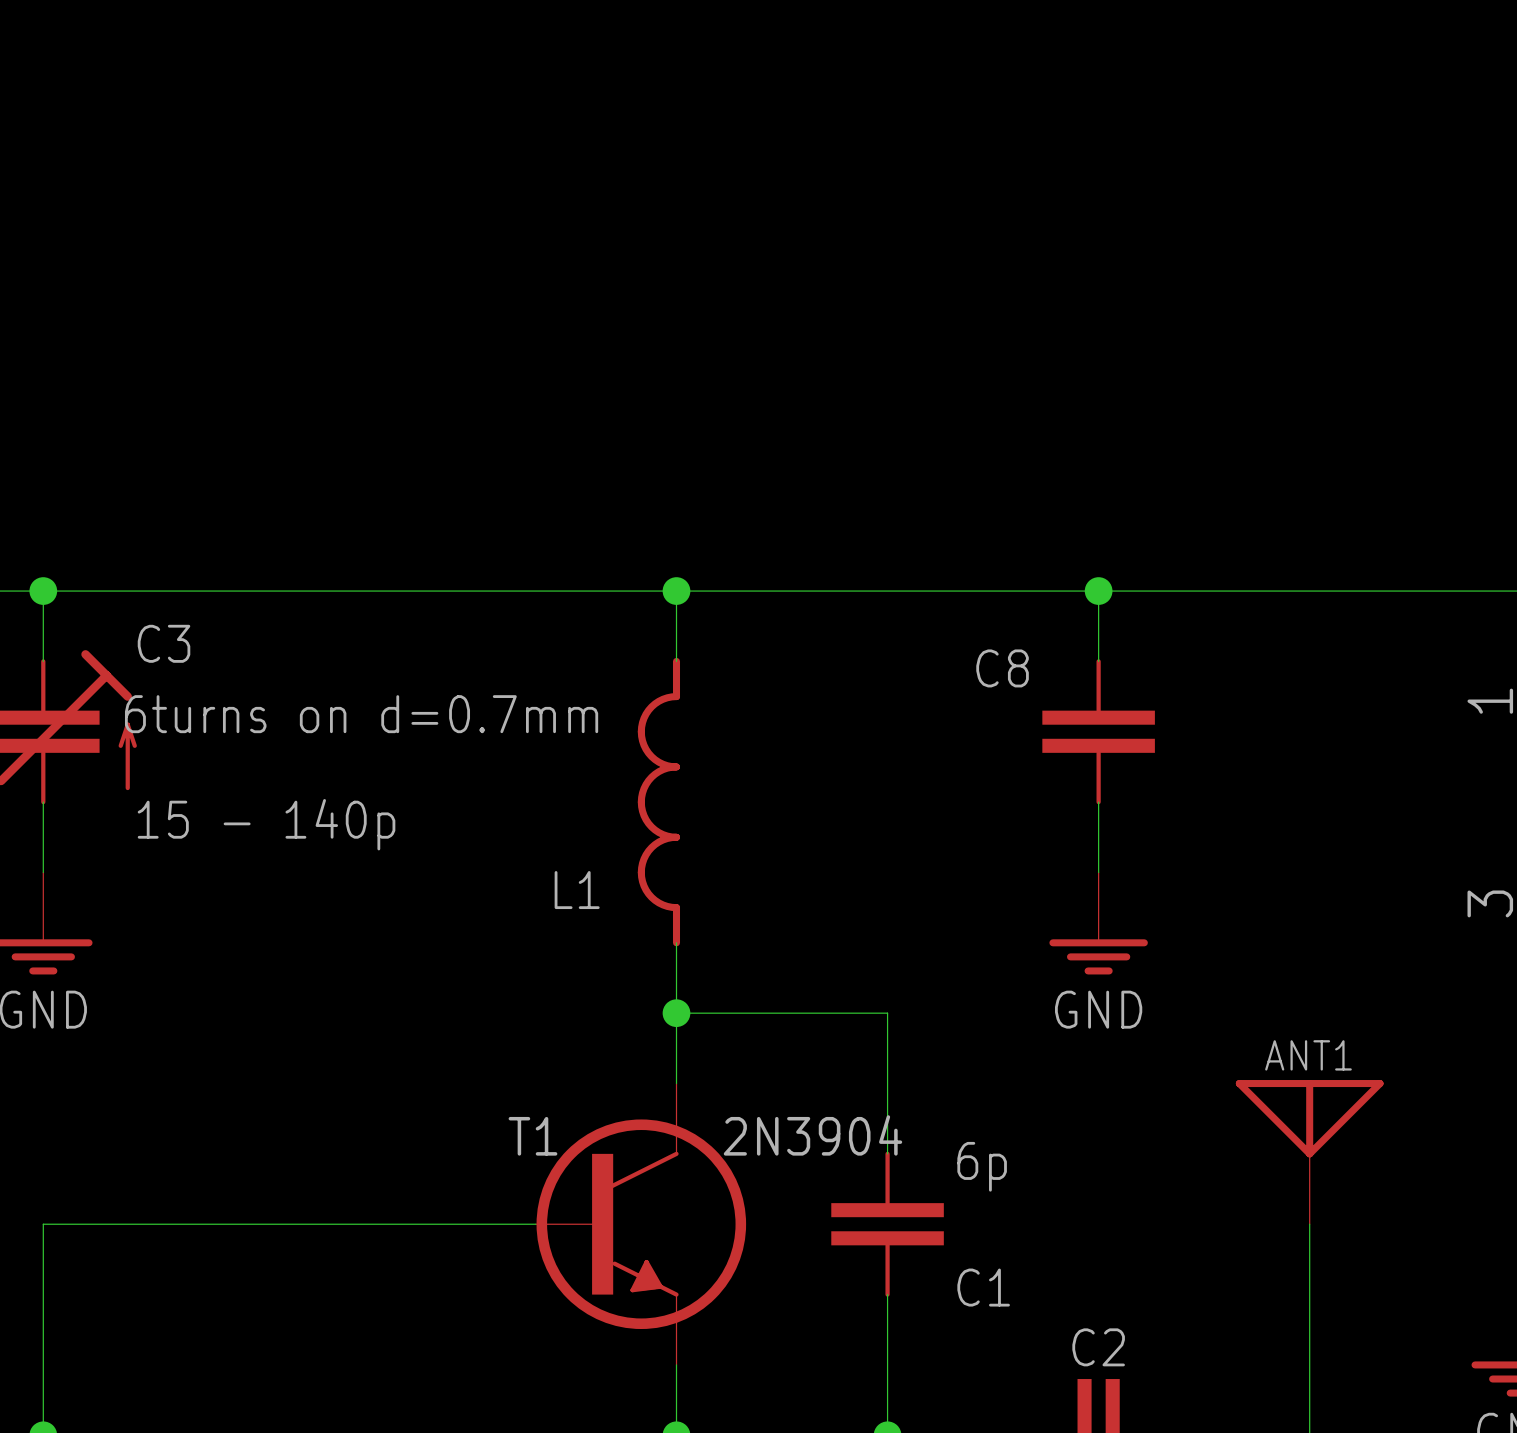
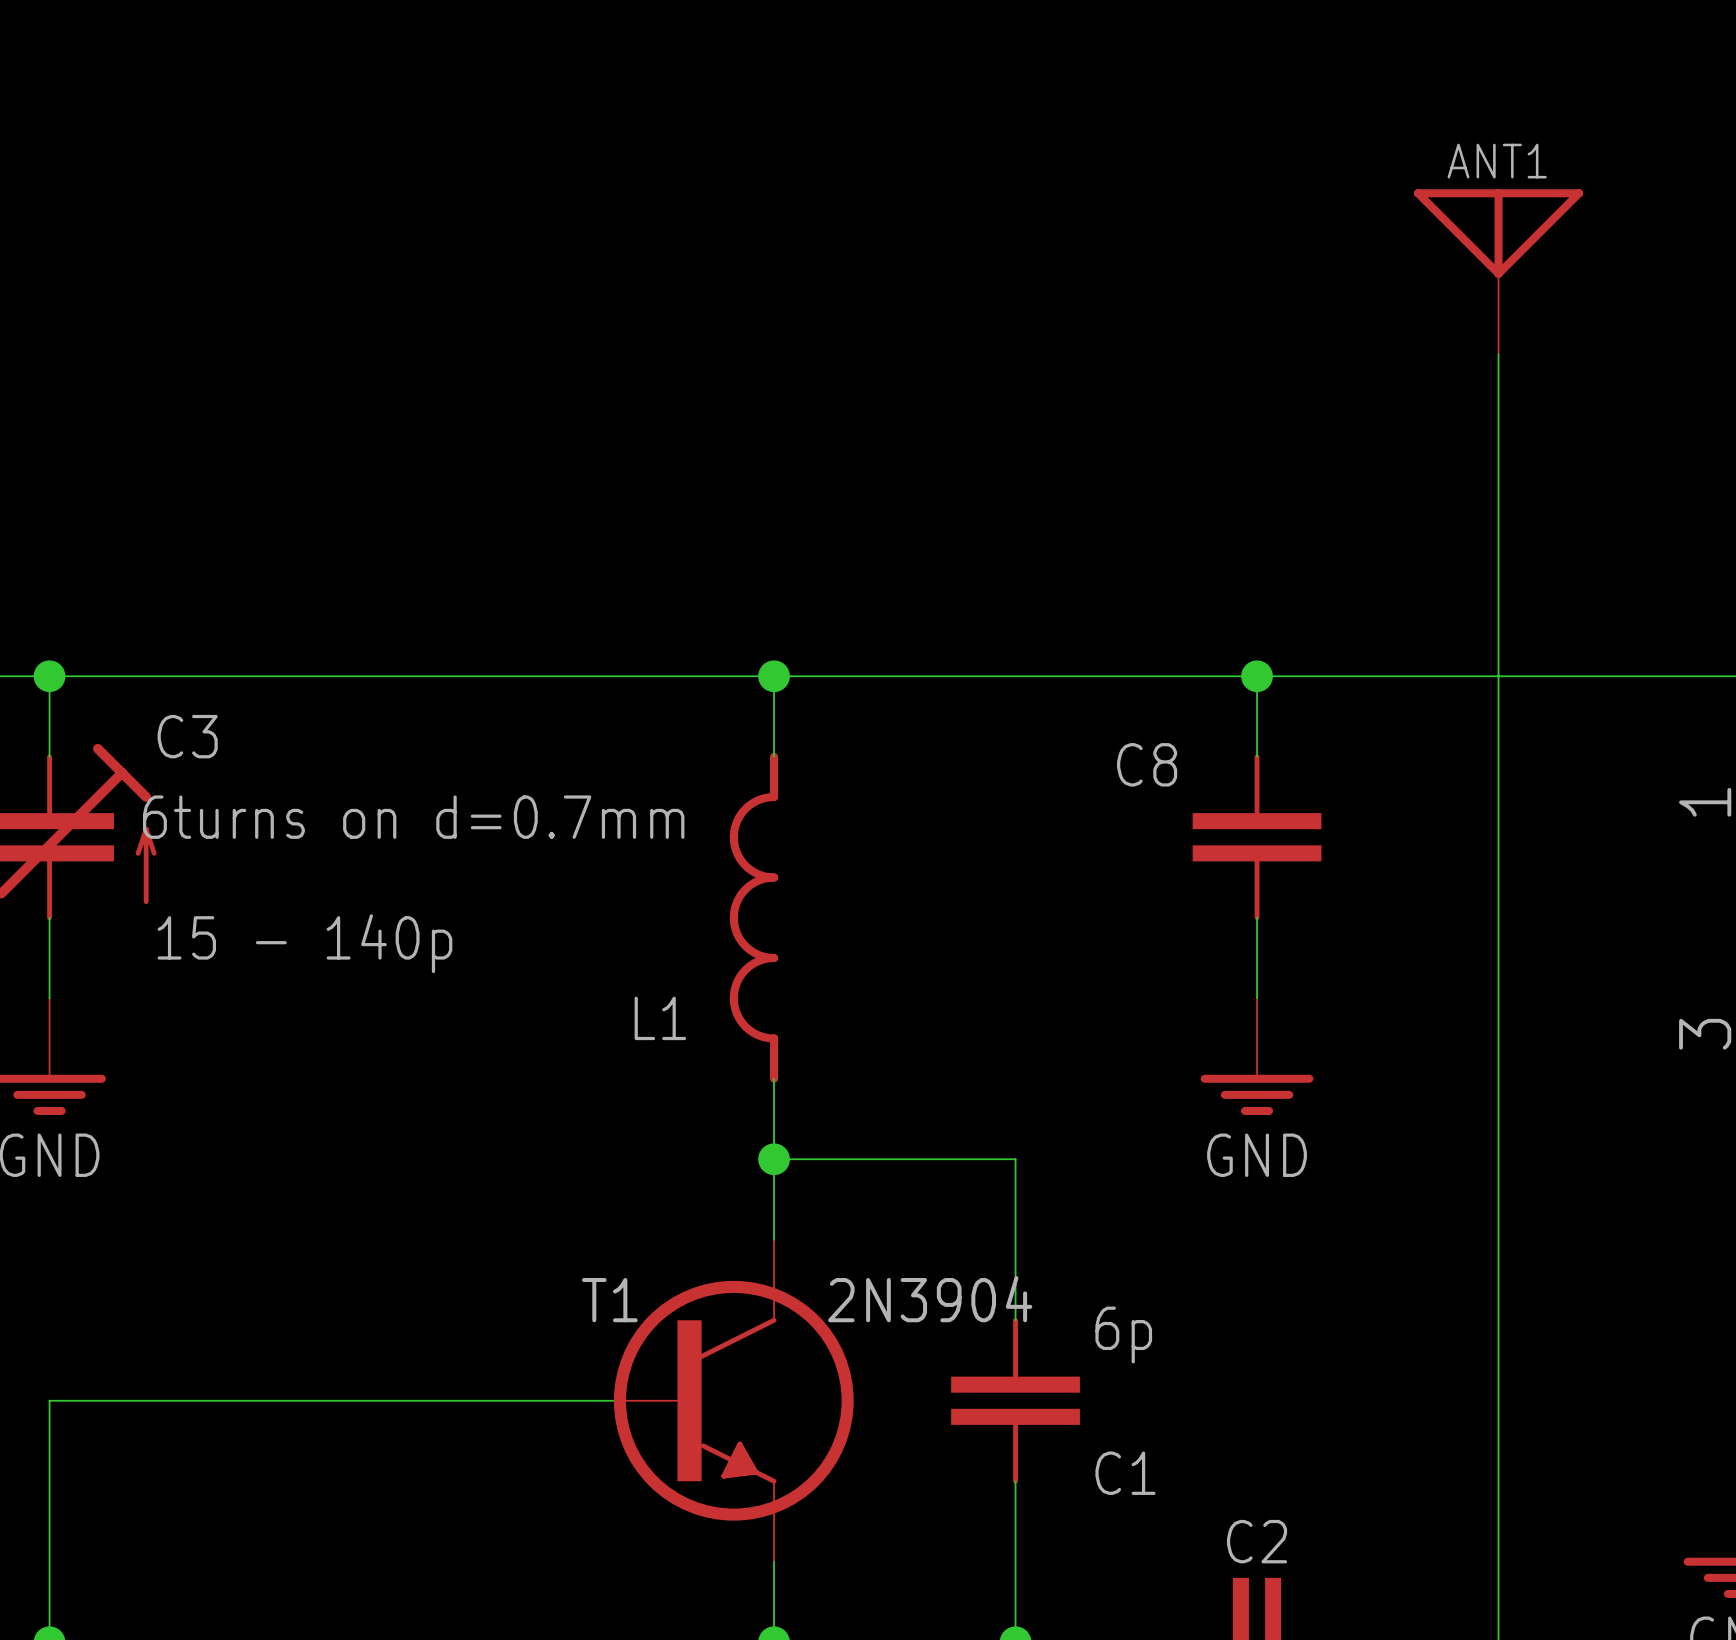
wire: none -> (1498, 354) (1498, 1400)
ANT1 position: (1309, 1152) -> (1498, 271)

